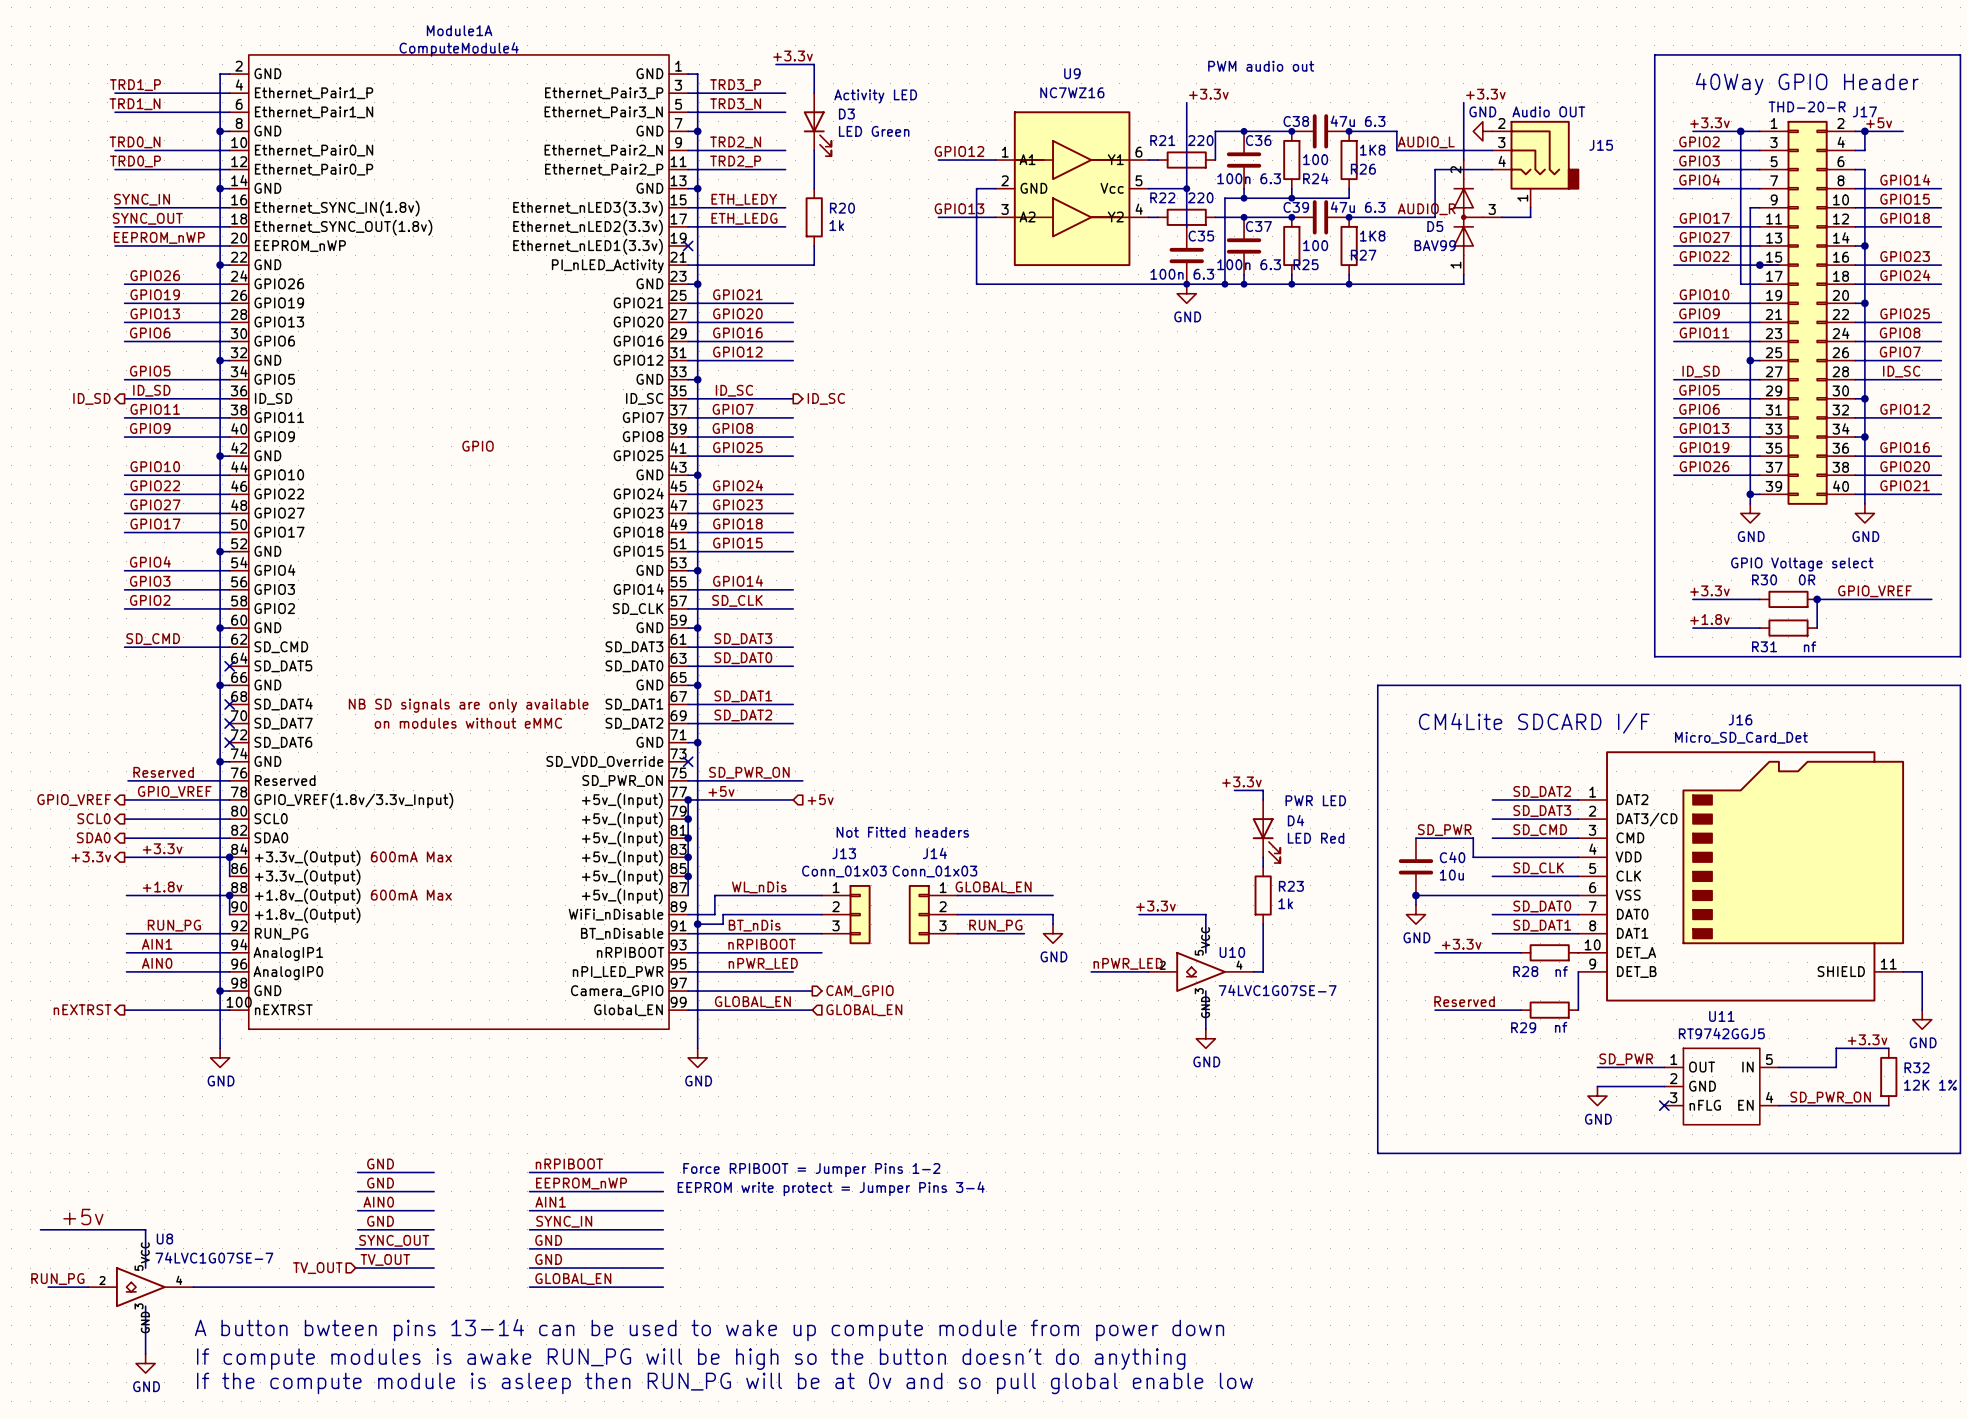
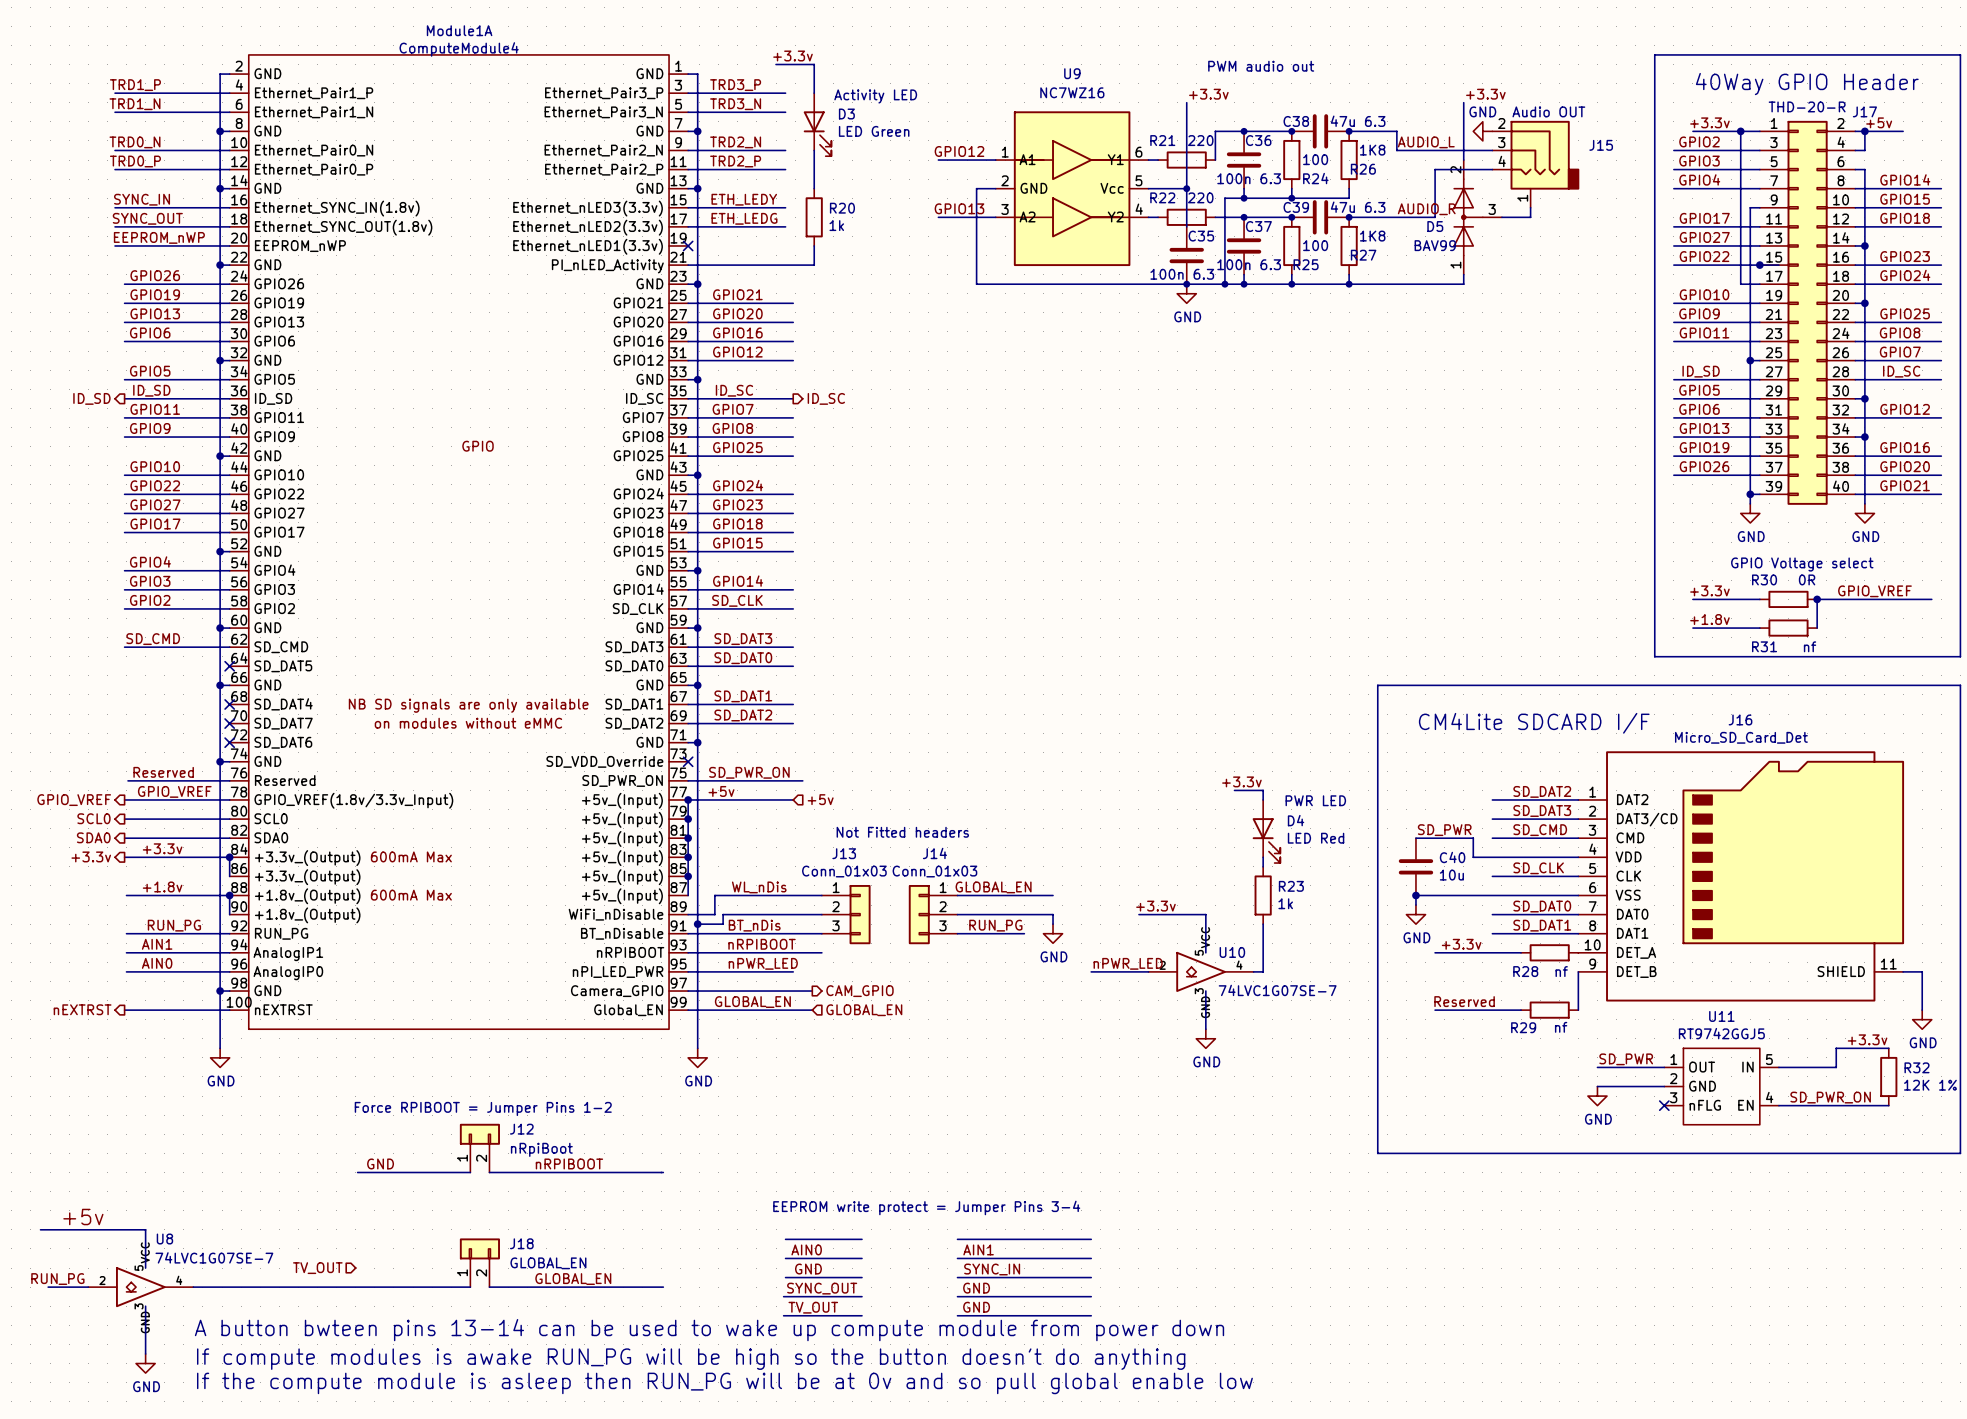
text: none -> Force RPIBOOT = Jumper Pins 1-2 (483, 1108)
J12: none -> nRpiBoot (479, 1148)
text: Force RPIBOOT = Jumper Pins 1-2 (811, 1170) -> none
wire: none -> (434, 1172) (470, 1172)
wire: none -> (489, 1172) (529, 1172)
label: GND (380, 1183) -> none
label: EEPROM_nWP (581, 1183) -> none
text position: EEPROM write protect = Jumper Pins 3-4 (831, 1188) -> EEPROM write protect = Jumper Pins 3-4 (926, 1207)
wire: (357, 1191) (434, 1191) -> none
wire: (529, 1191) (663, 1191) -> none
label: AIN0 (378, 1202) -> none
label: AIN1 (550, 1202) -> none
wire: (357, 1210) (434, 1210) -> none
wire: (529, 1210) (663, 1210) -> none
label: GND (380, 1221) -> none
label: SYNC_IN (564, 1221) -> none
wire: (357, 1229) (434, 1229) -> none
wire: (529, 1229) (663, 1229) -> none
wire: none -> (785, 1239) (861, 1239)
wire: none -> (957, 1239) (1091, 1239)
label: SYNC_OUT (394, 1240) -> none
label: GND (548, 1240) -> none
wire: (355, 1248) (434, 1248) -> none
wire: (529, 1248) (663, 1248) -> none
label: none -> AIN0 (806, 1249)
label: none -> AIN1 (978, 1249)
wire: none -> (785, 1258) (861, 1258)
wire: none -> (957, 1258) (1091, 1258)
label: TV_OUT (385, 1259) -> none
label: GND (548, 1259) -> none
J18: none -> GLOBAL_EN (479, 1262)
wire: (355, 1268) (434, 1268) -> none
wire: (529, 1268) (663, 1268) -> none
label: none -> GND (808, 1269)
label: none -> SYNC_IN (992, 1269)
wire: none -> (785, 1277) (861, 1277)
wire: none -> (957, 1277) (1091, 1277)
wire: none -> (434, 1287) (470, 1287)
wire: none -> (489, 1287) (529, 1287)
label: none -> SYNC_OUT (822, 1288)
label: none -> GND (976, 1288)
wire: none -> (783, 1296) (861, 1296)
wire: none -> (957, 1296) (1091, 1296)
label: none -> TV_OUT (813, 1307)
label: none -> GND (976, 1307)
wire: none -> (783, 1315) (861, 1315)
wire: none -> (957, 1315) (1091, 1315)

